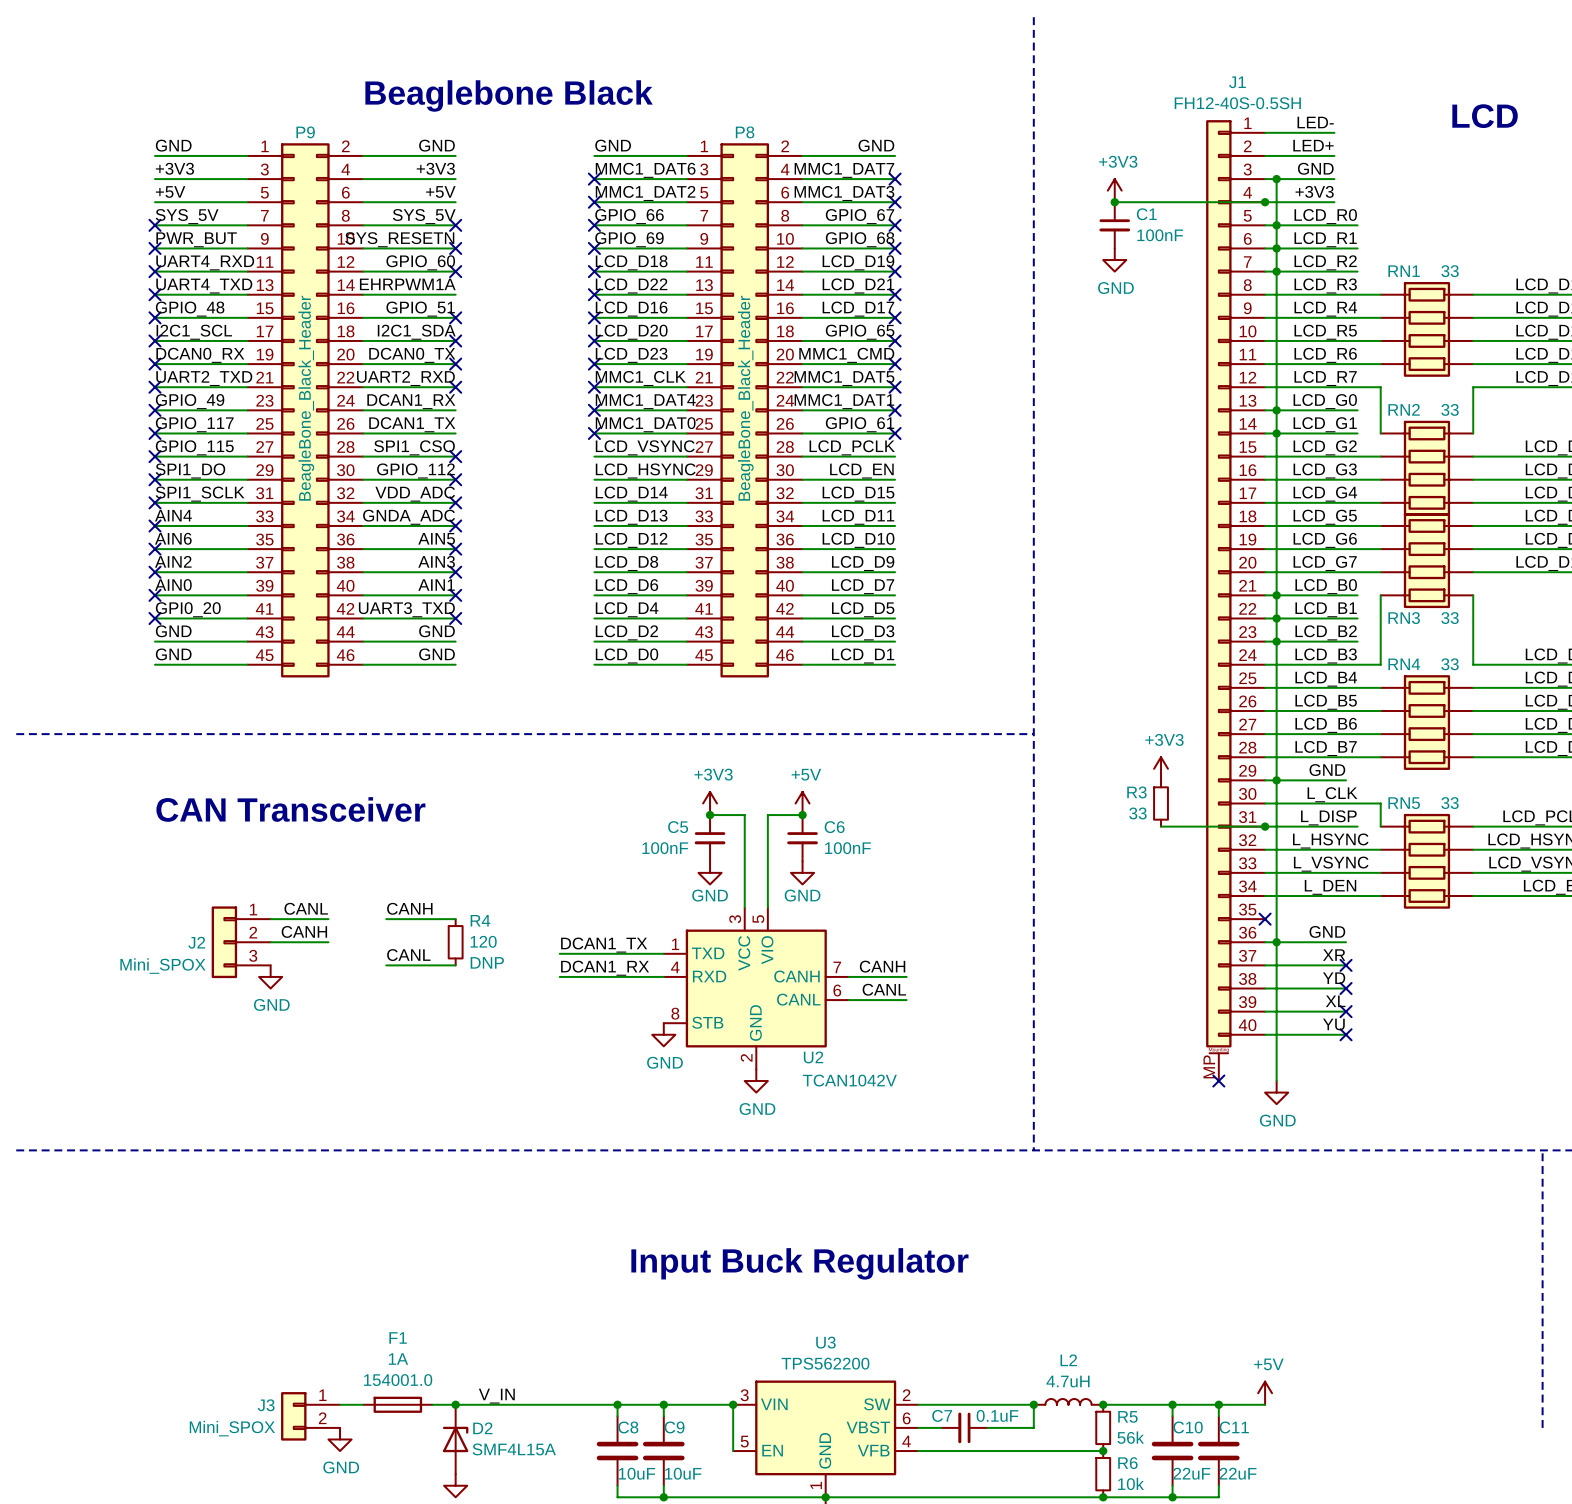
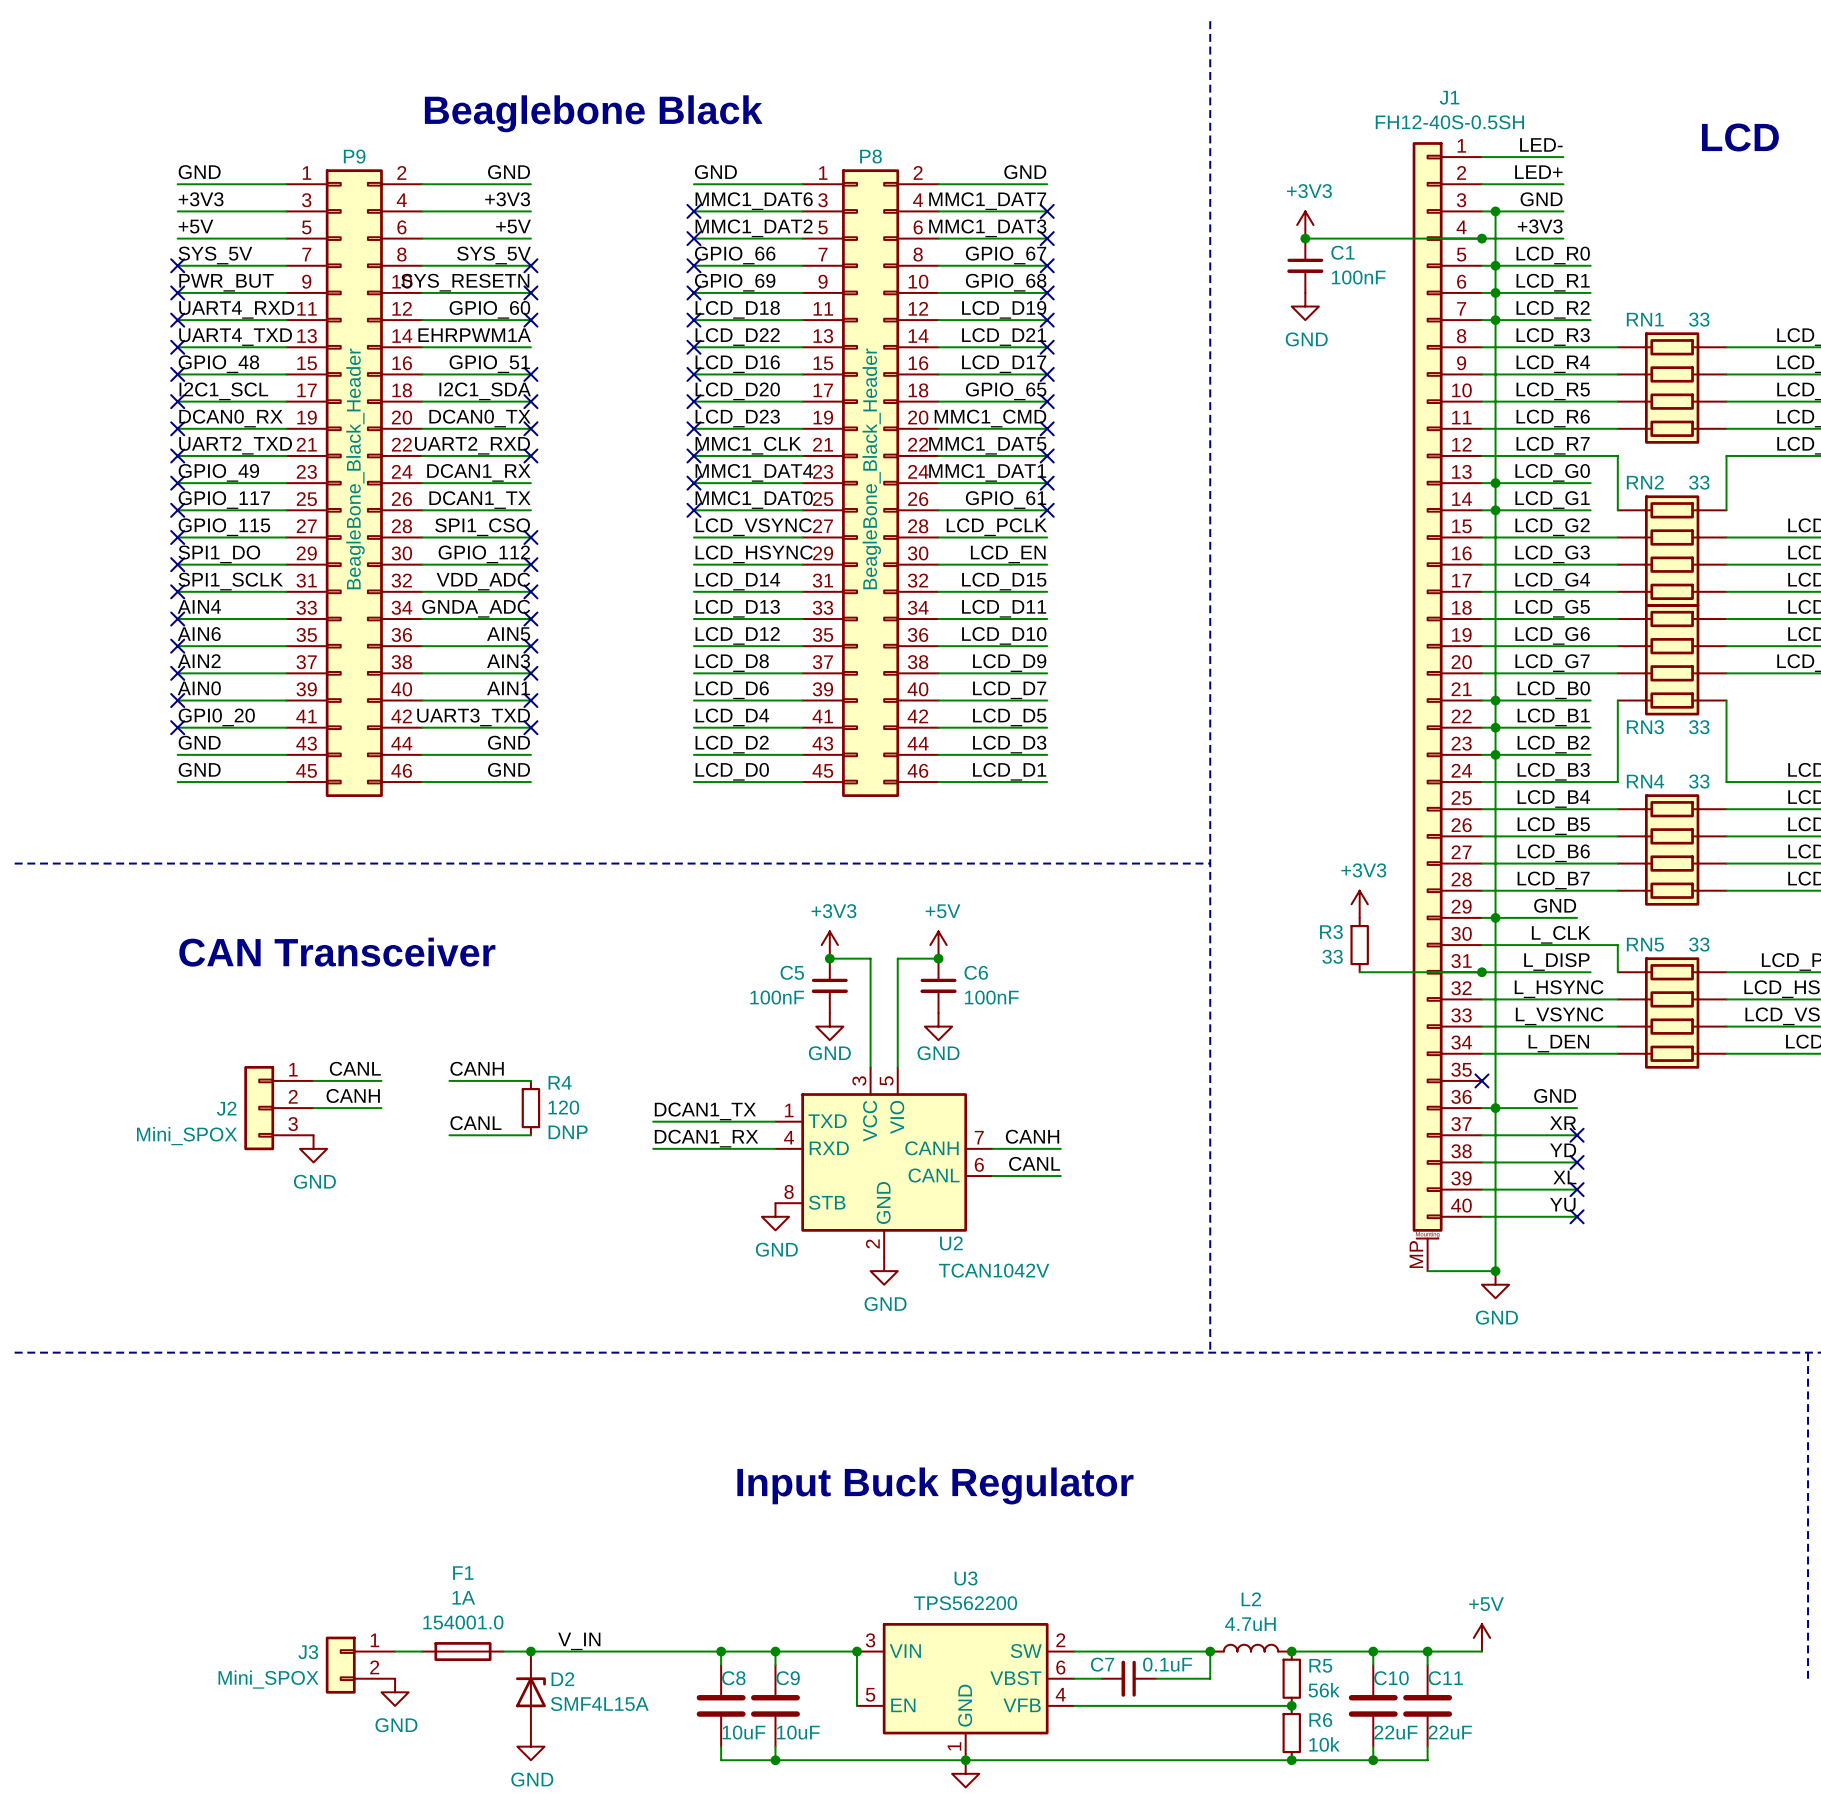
wire: none -> (1427, 1271) (1495, 1271)
no-connect mark: (1218, 1081) -> none
junction: none -> (1495, 1271)

